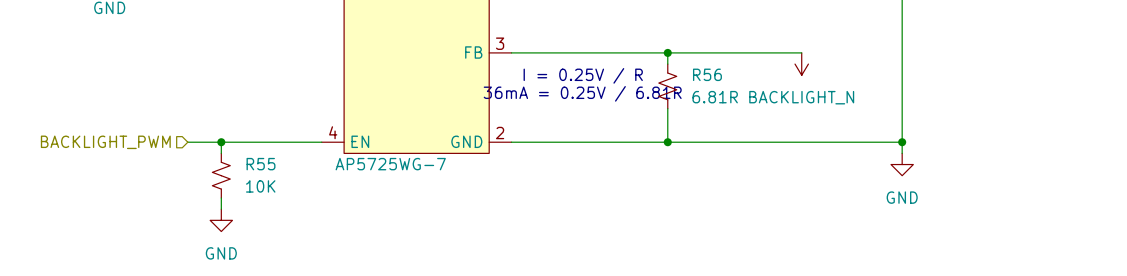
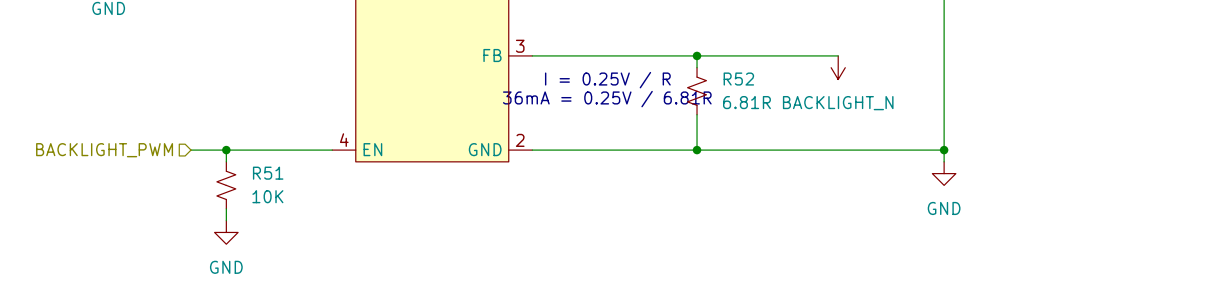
R56 name: R56 (707, 74) -> R52 (738, 79)
R55 name: R55 (261, 164) -> R51 (268, 173)
part value: AP5725WG-7 (390, 164) -> none

